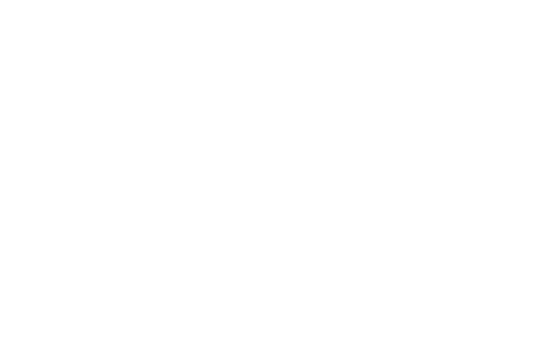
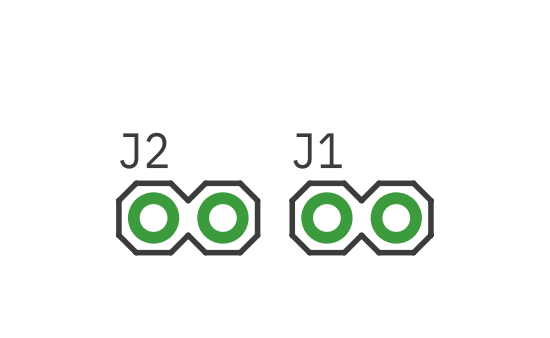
J2: none -> (188, 217)
J1: none -> (361, 217)

